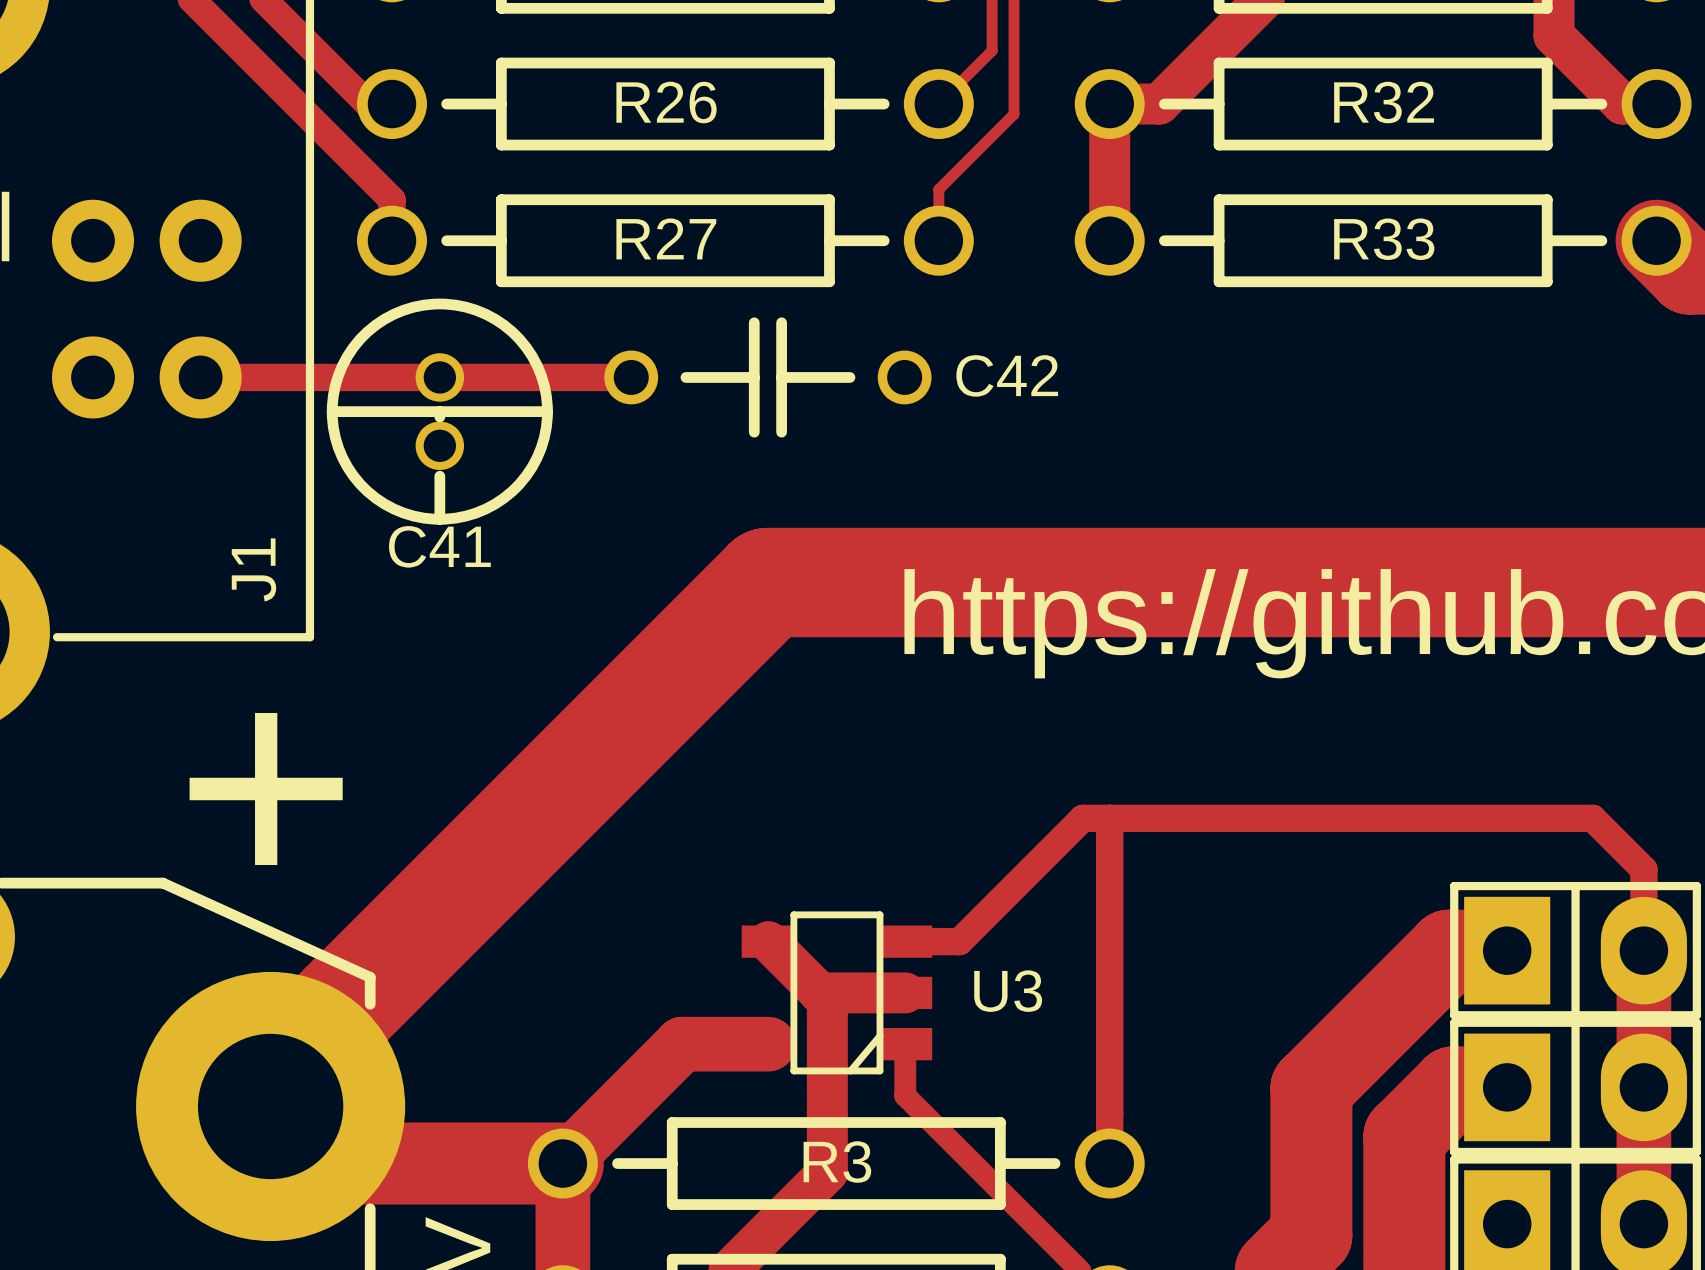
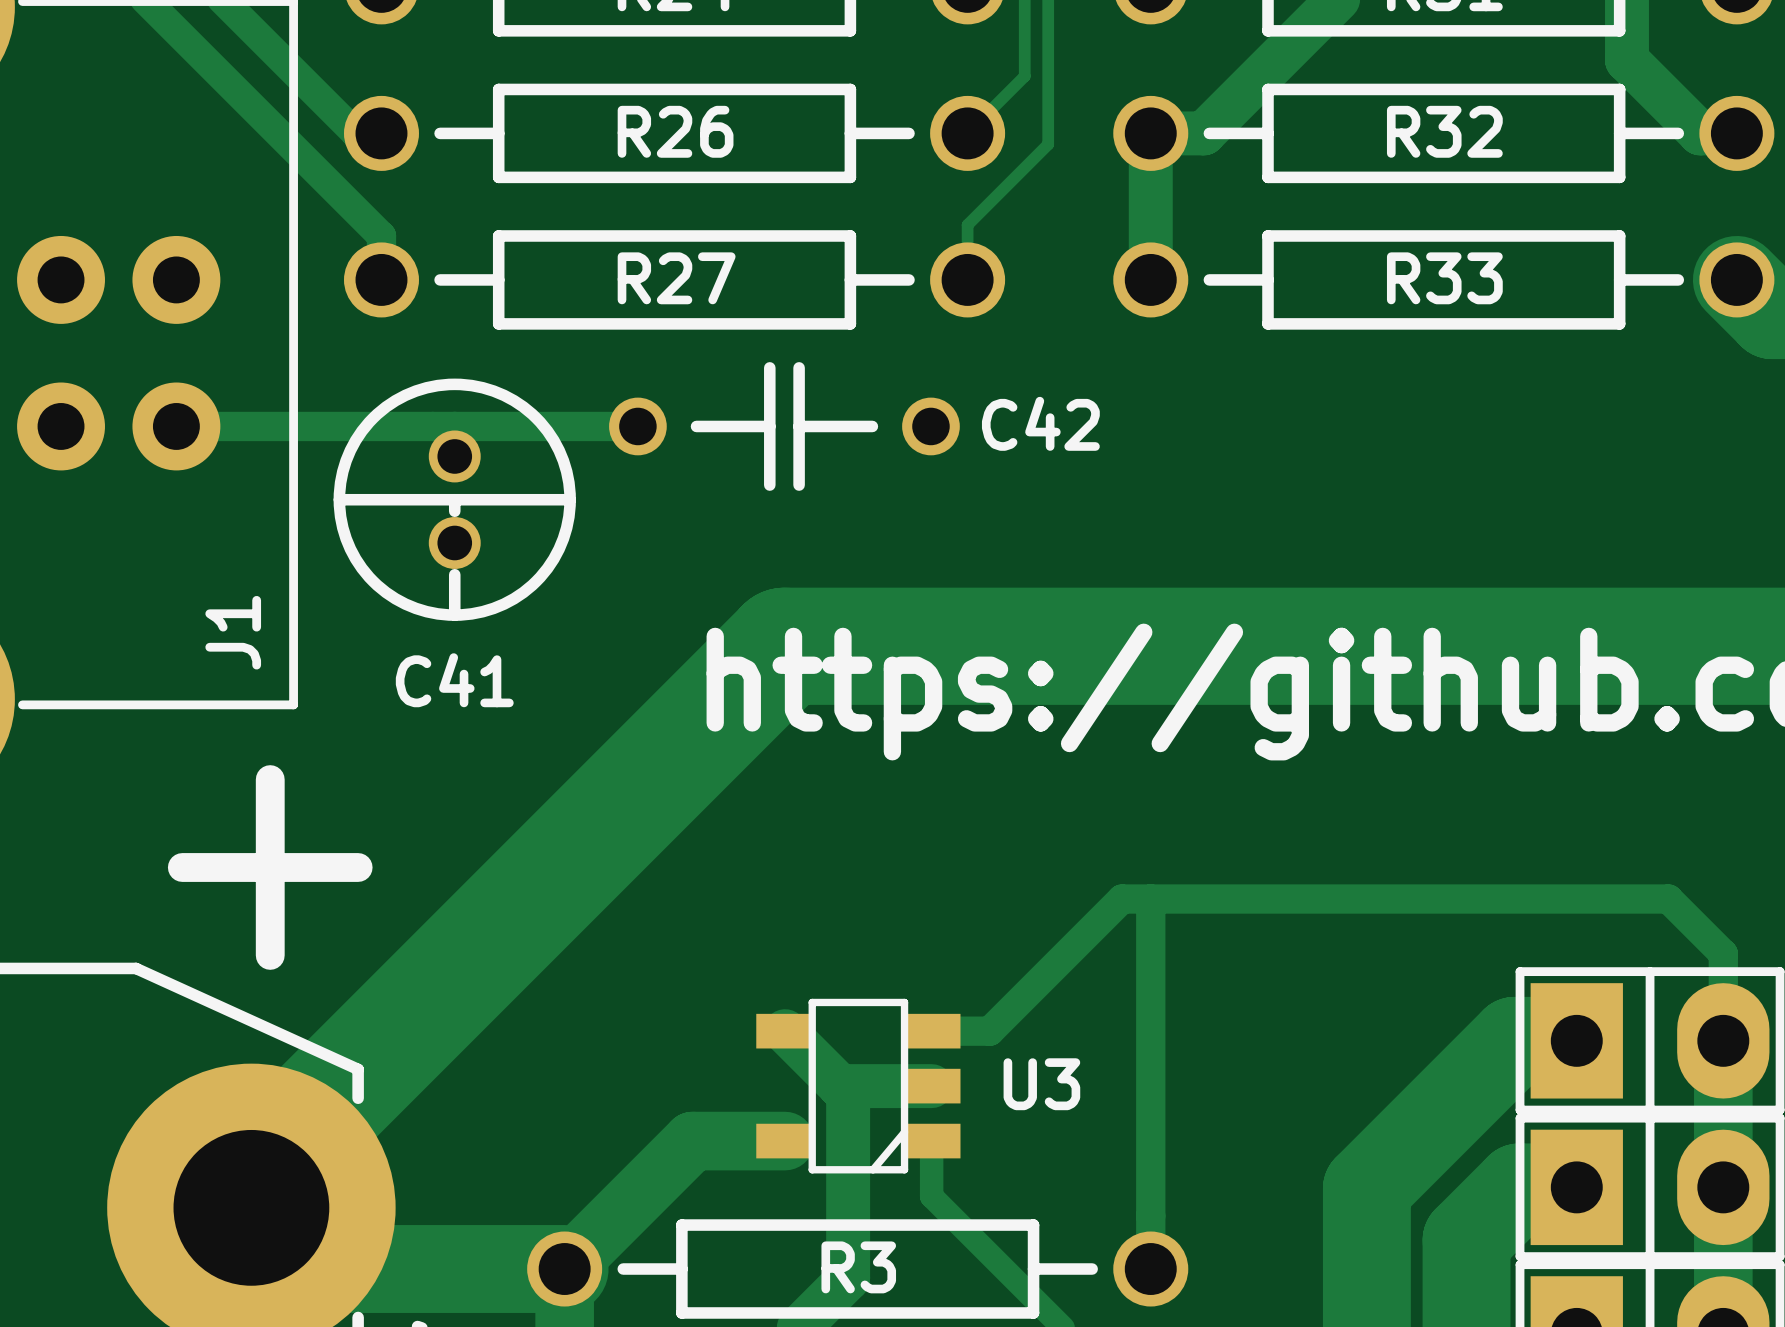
C41 footprint: [326, 298, 553, 525] -> [333, 378, 576, 621]
C41 name position: C41 (439, 546) -> C41 (454, 680)

